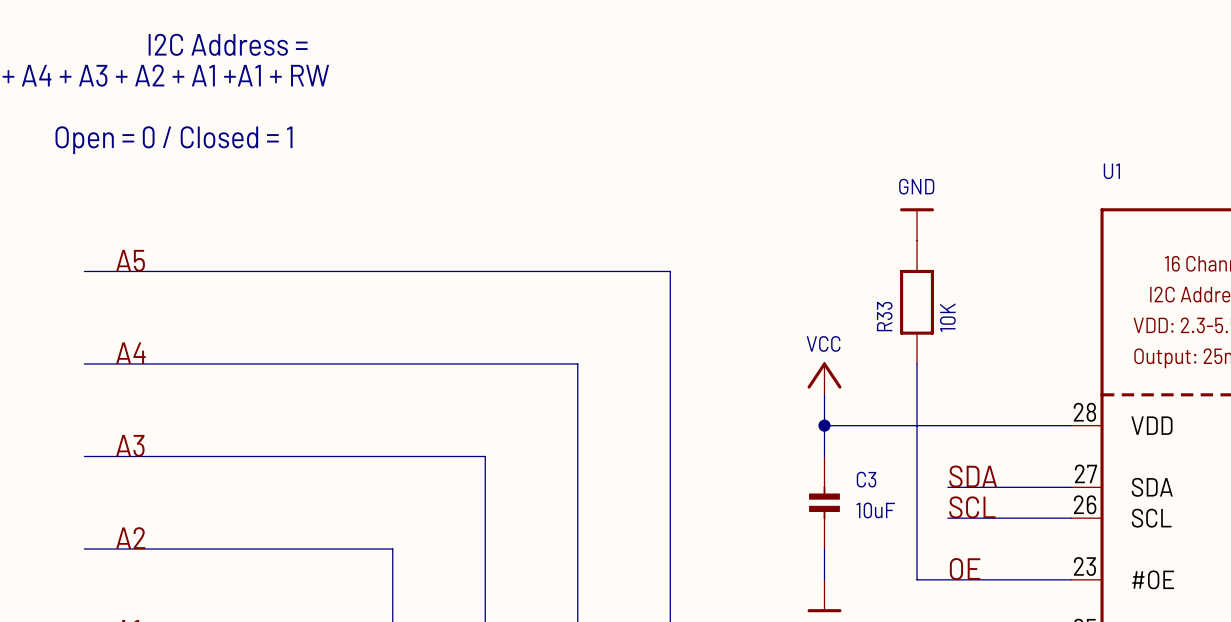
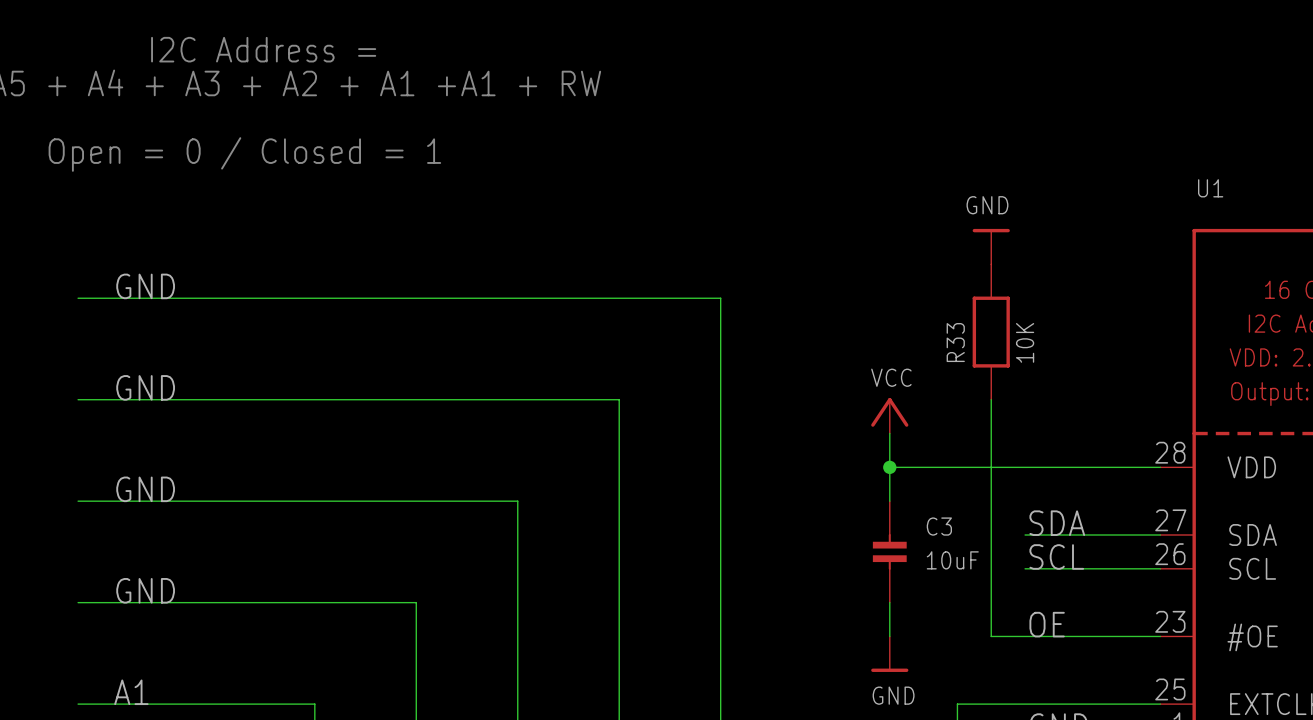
label: A5 (130, 260) -> GND (145, 286)
label: A4 (130, 353) -> GND (145, 387)
label: A3 (130, 445) -> GND (145, 489)
label: A2 (130, 538) -> GND (145, 590)

